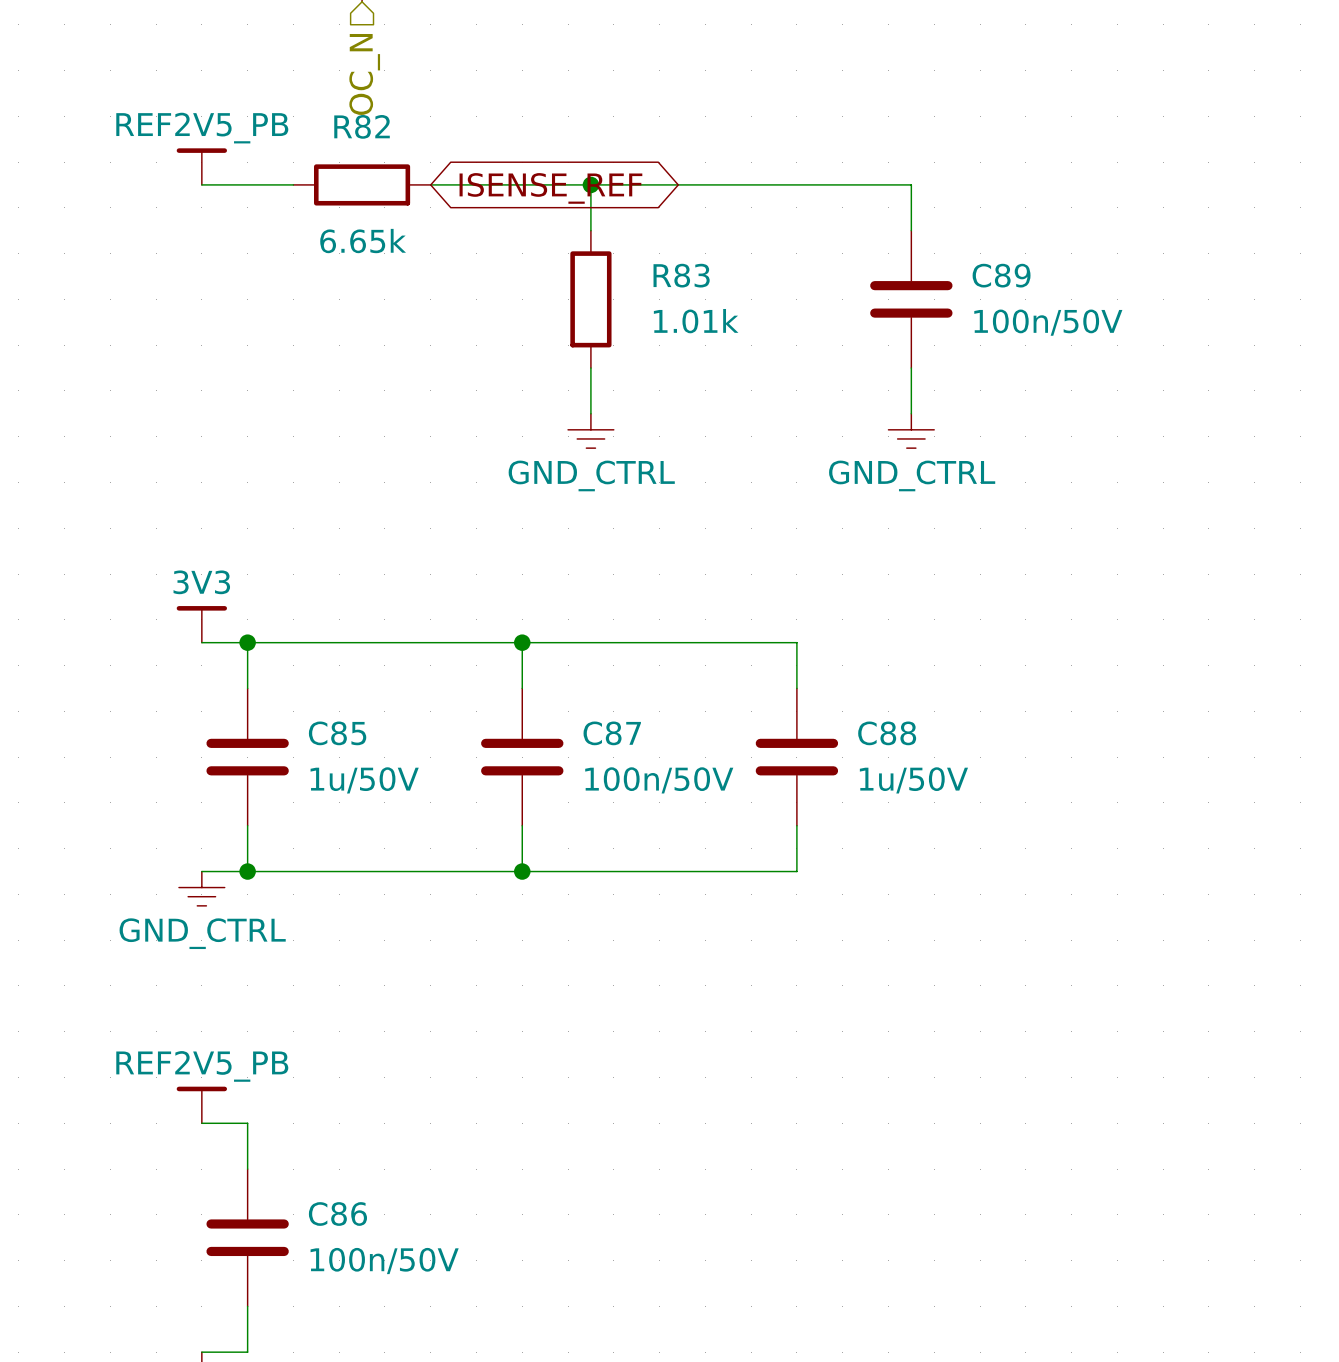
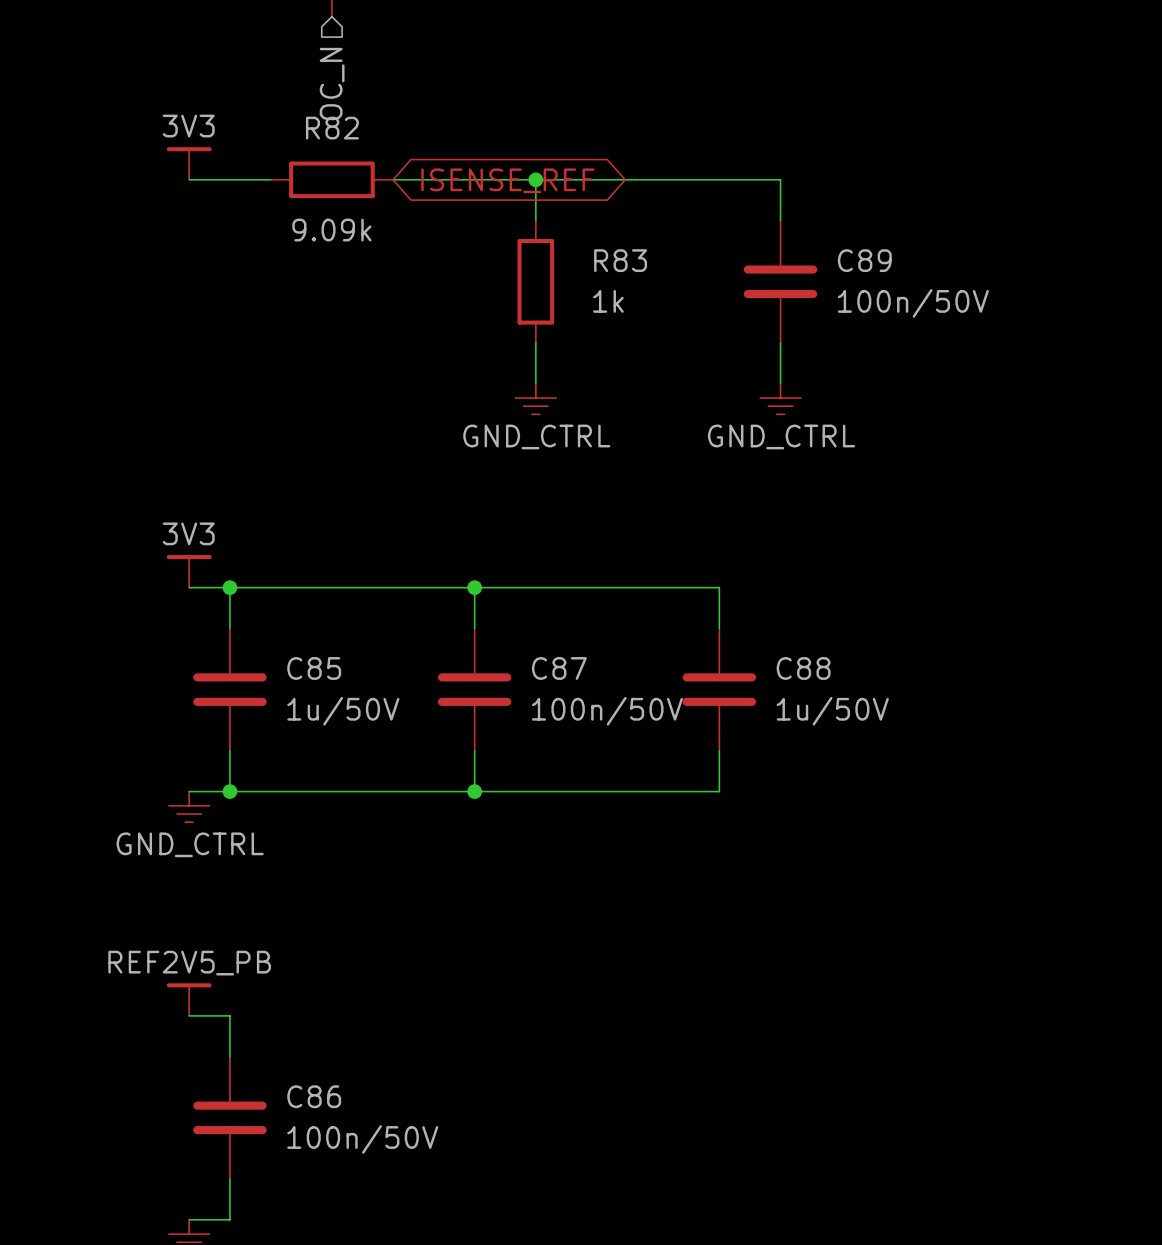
power symbol: REF2V5_PB (201, 166) -> 3V3 (189, 163)
wire: (865, 184) (911, 184) (911, 230) -> (780, 179) (780, 220)
R82 value: 6.65k (363, 241) -> 9.09k (331, 230)
C89 position: (911, 299) -> (780, 281)
R83 value: 1.01k (696, 321) -> 1k (608, 301)
wire: (911, 368) (911, 413) -> (780, 342) (780, 383)
power symbol position: GND_CTRL (911, 430) -> GND_CTRL (780, 399)

